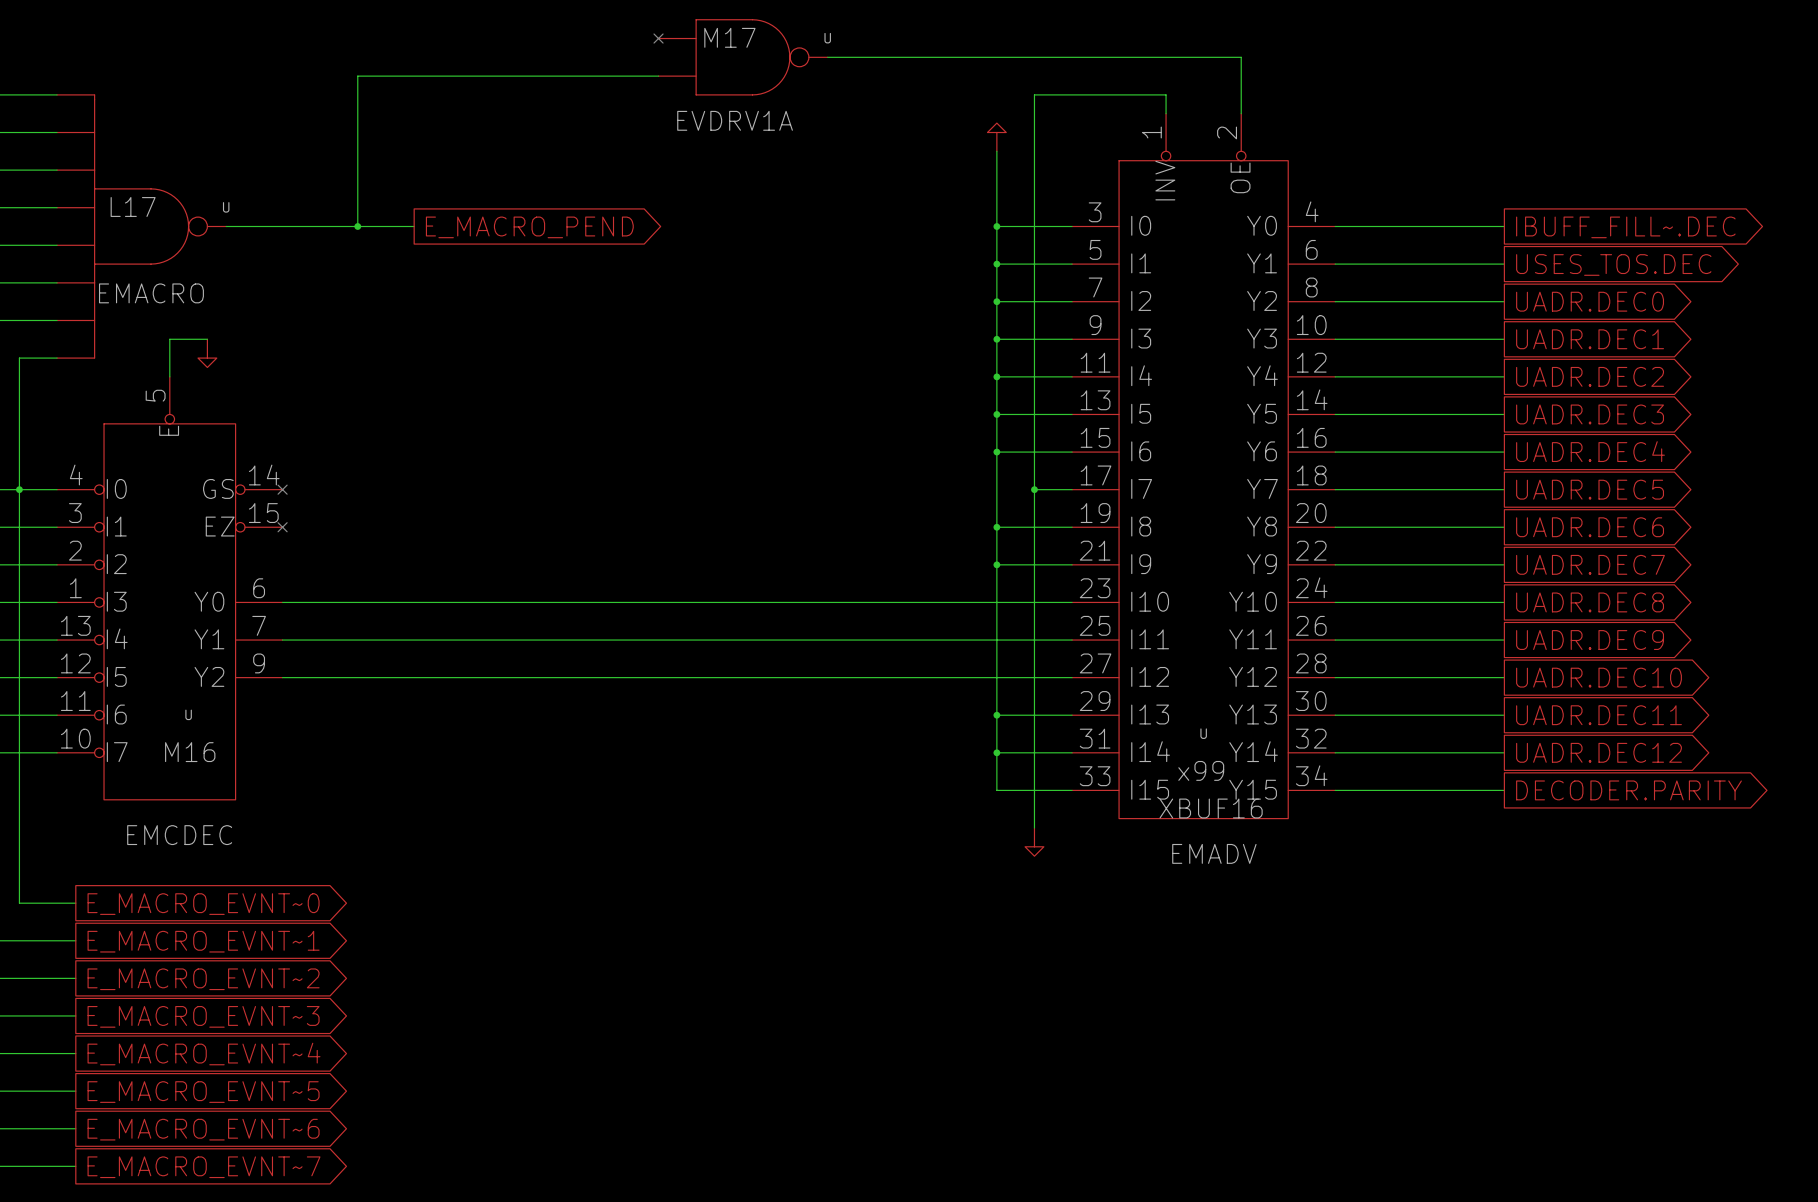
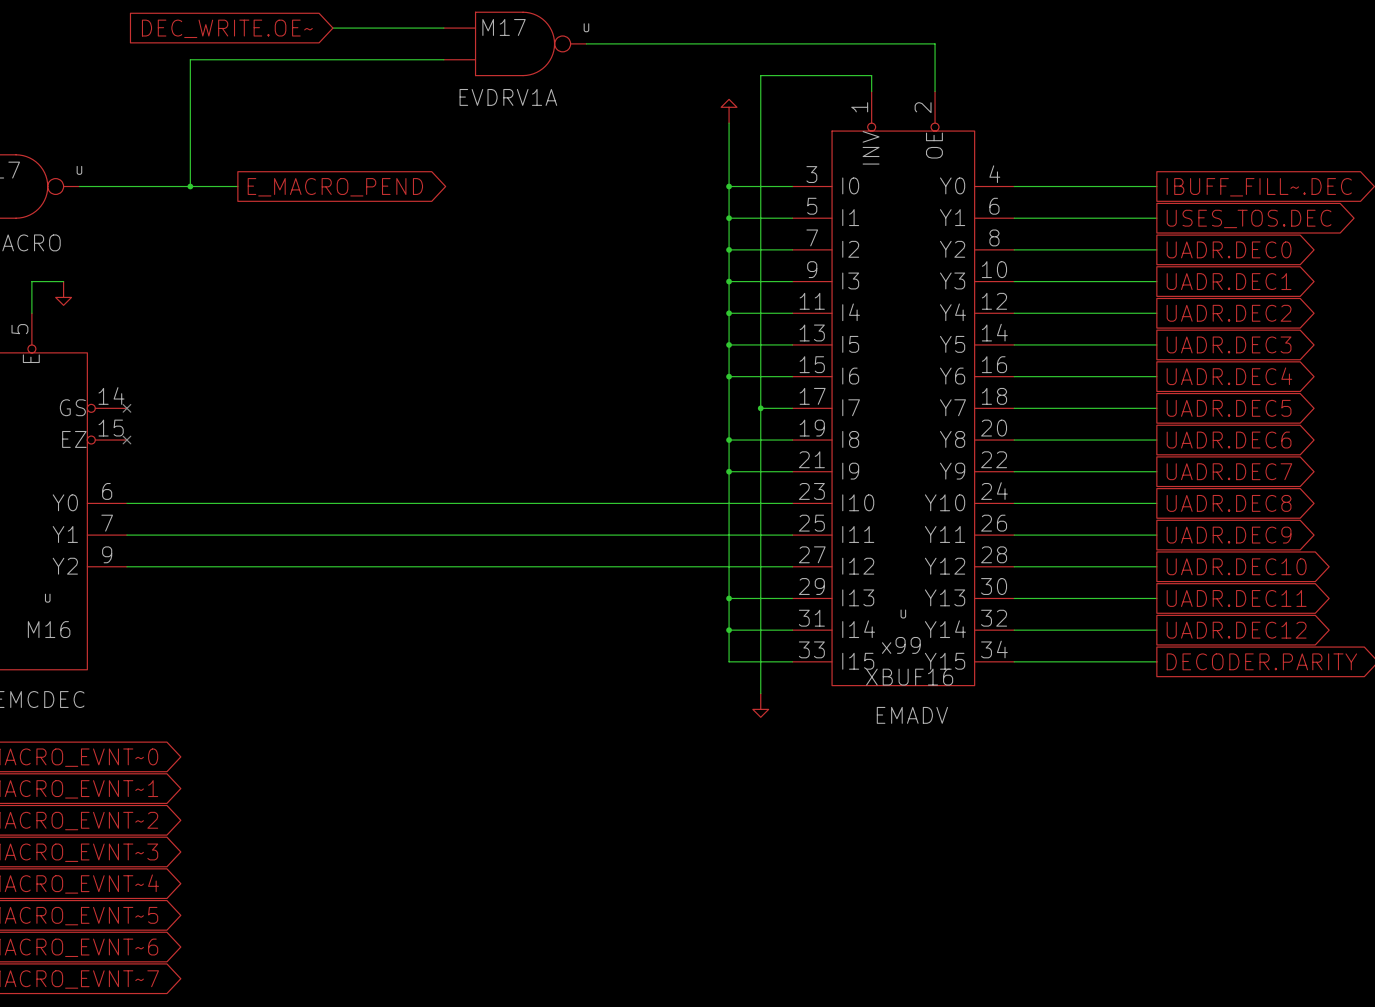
wire: none -> (332, 28) (443, 28)
no-connect mark: (658, 38) -> none
global label: none -> DEC_WRITE.OE~ (227, 28)

